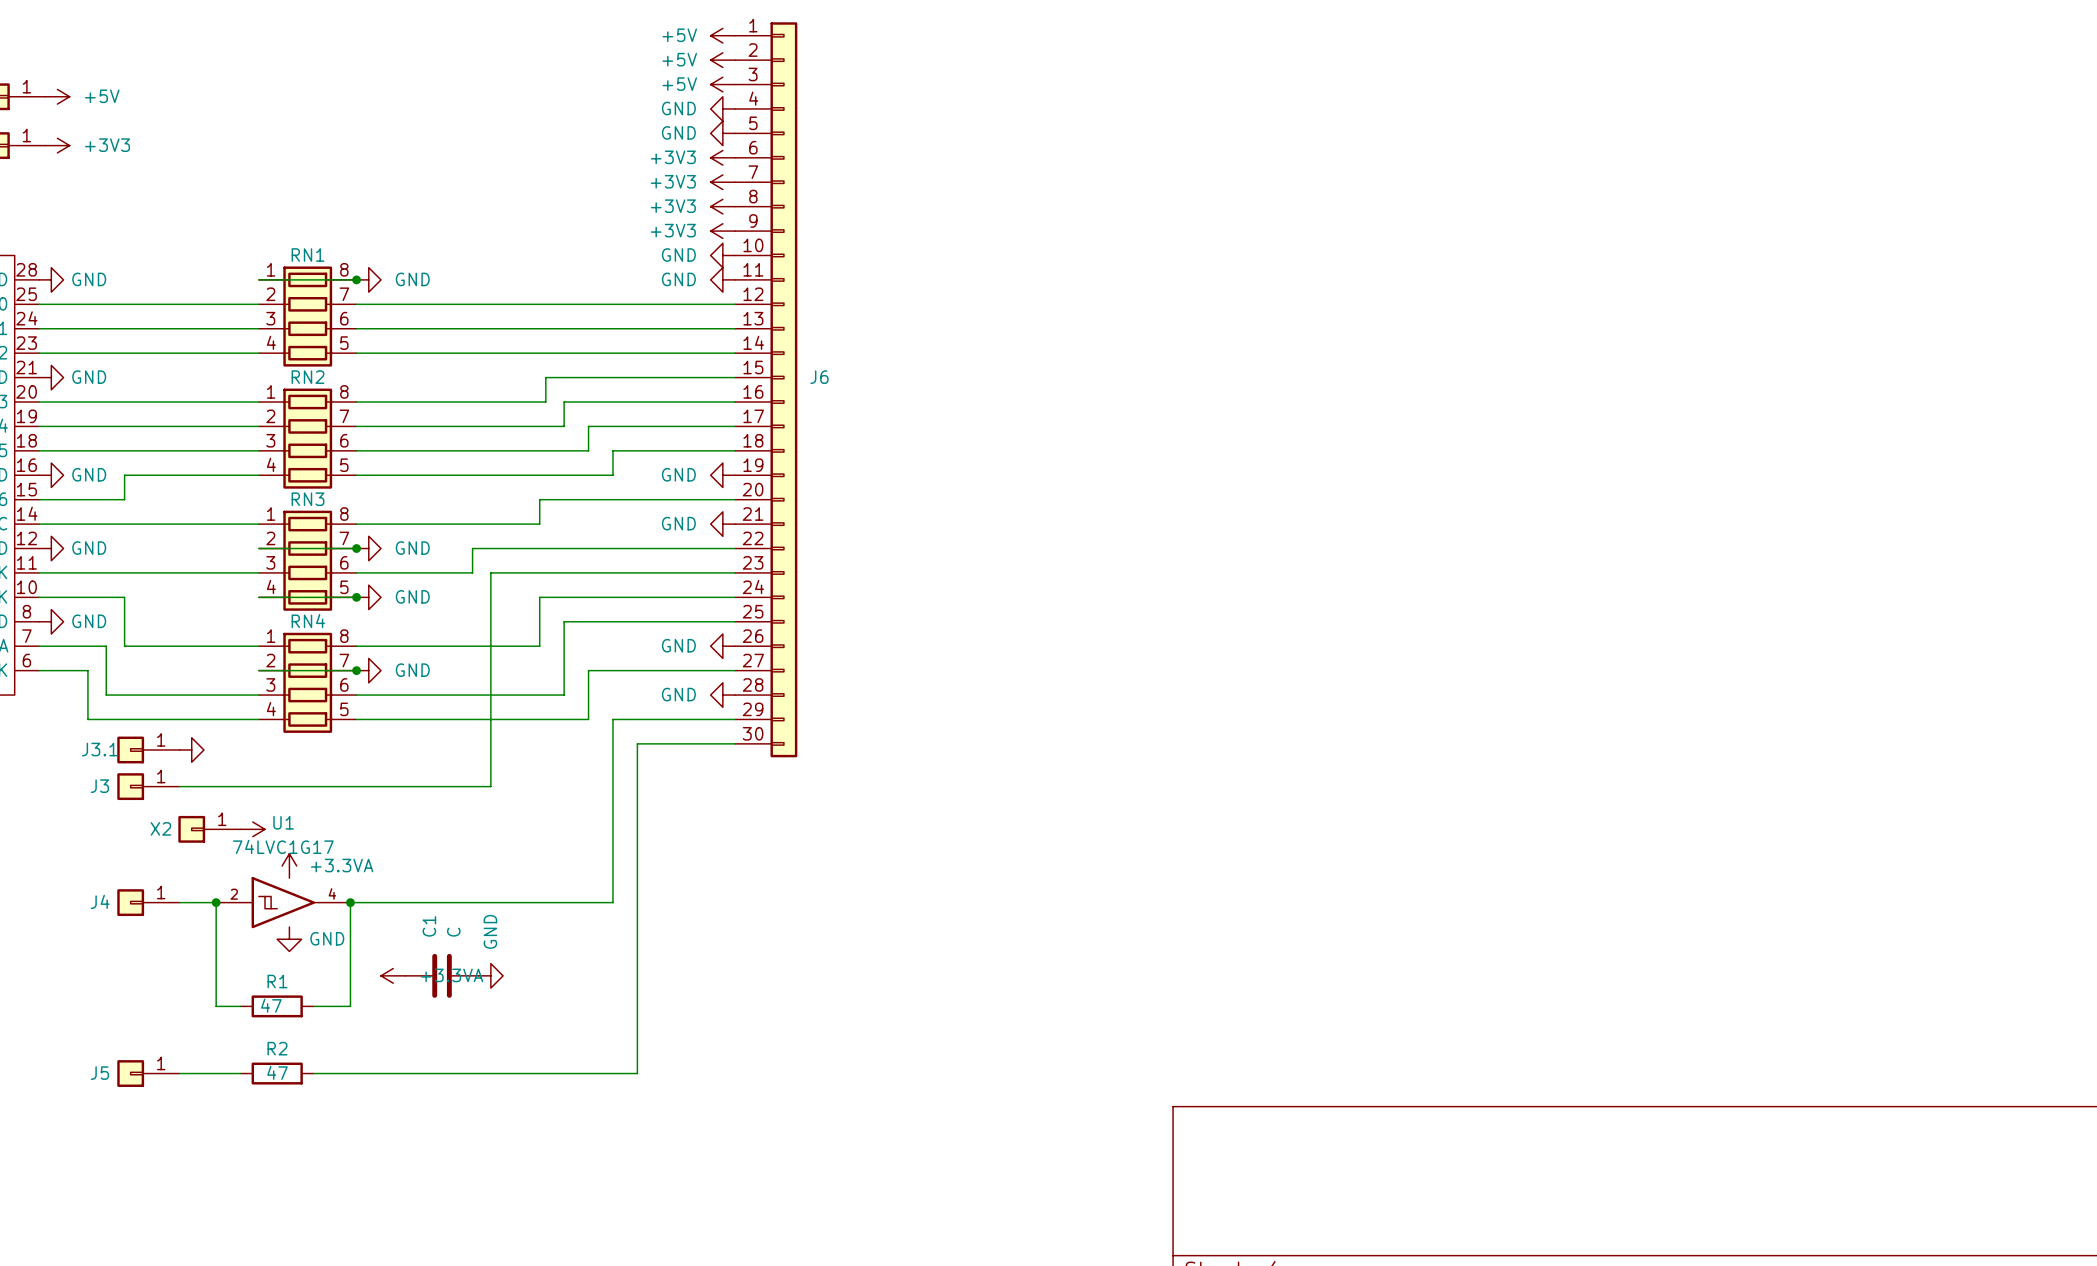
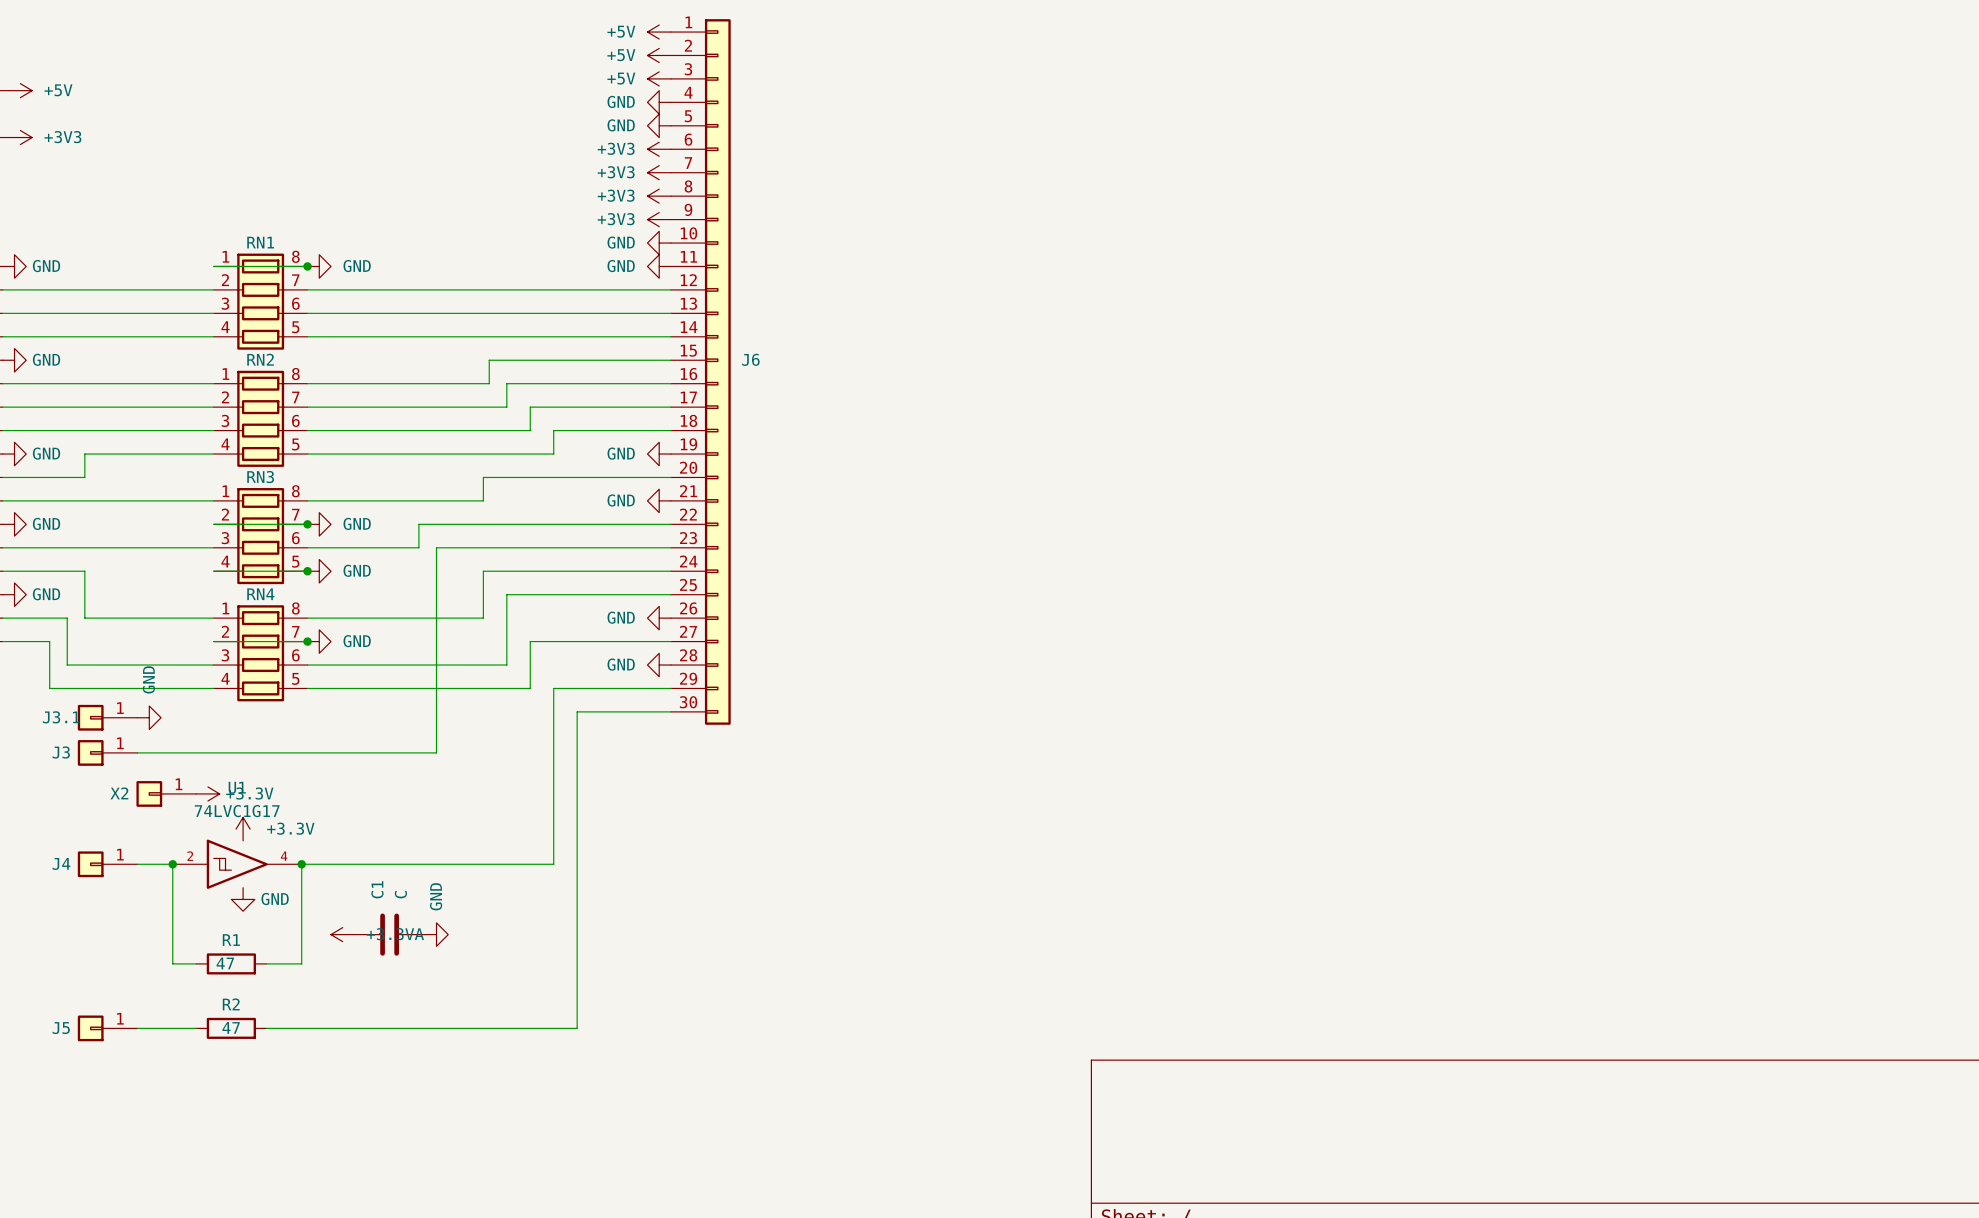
power symbol text: none -> GND (148, 679)
power symbol text: none -> +3.3V (249, 793)
power symbol: +3.3VA (289, 865) -> +3.3V (243, 829)

